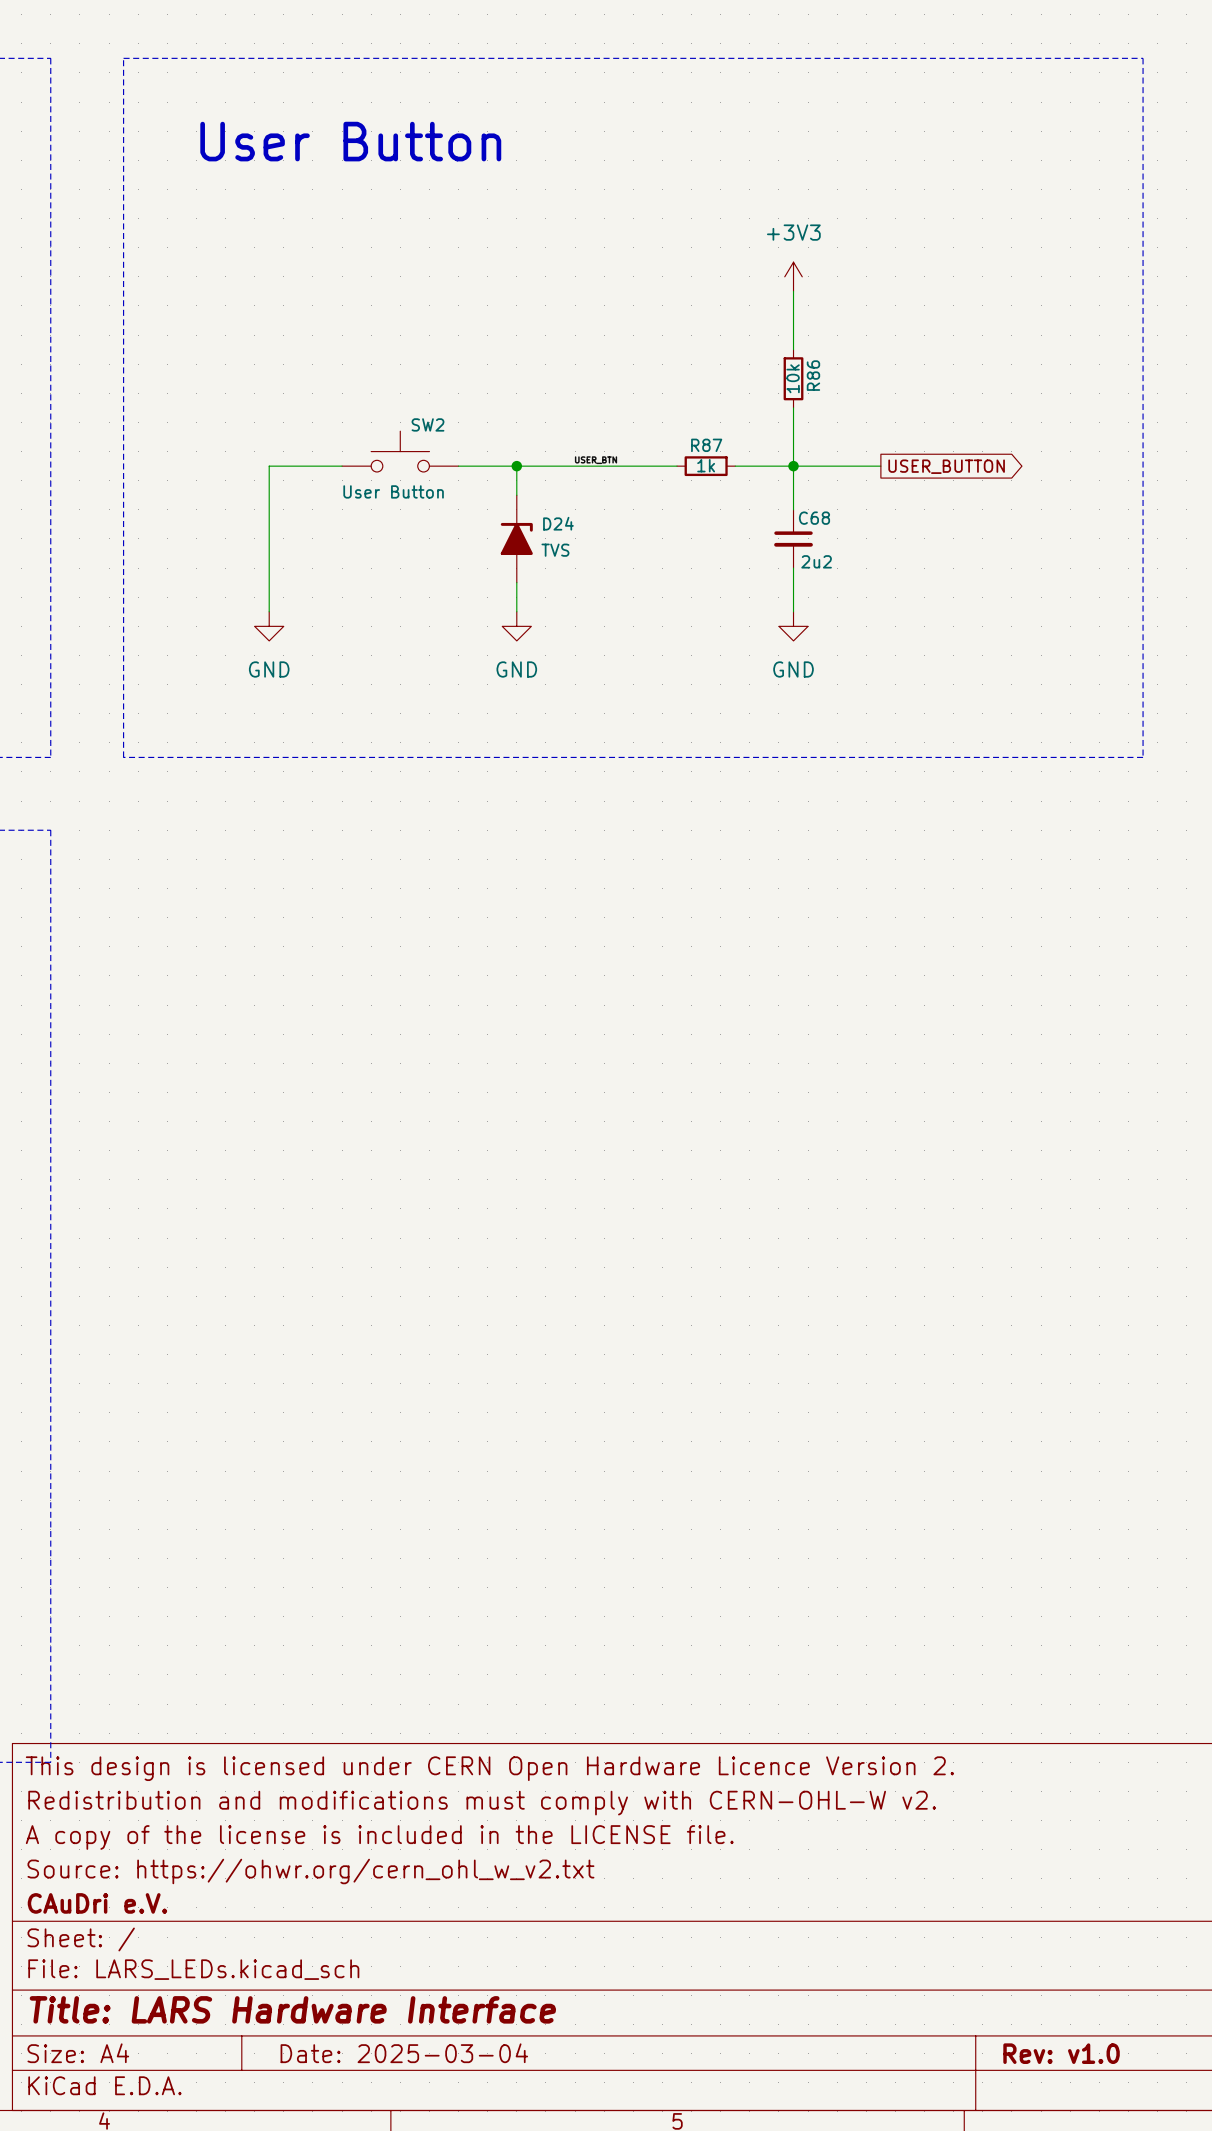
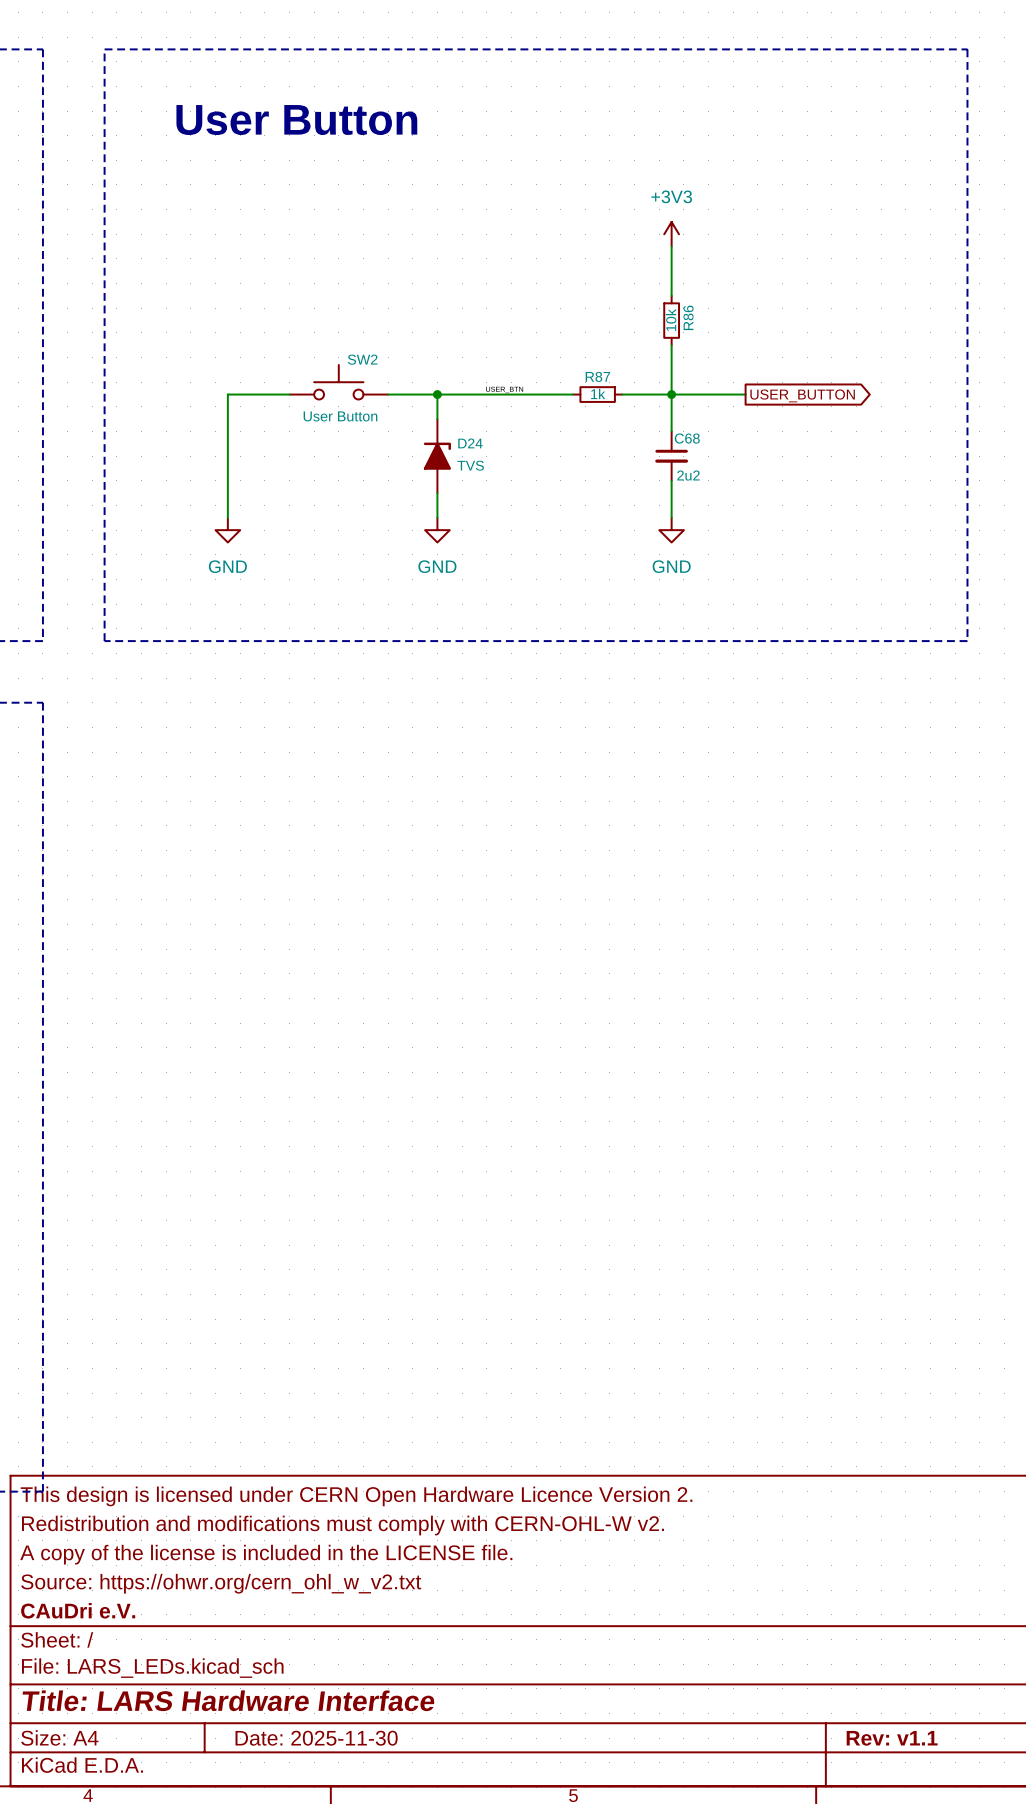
title block: Date: 2025-03-04 (404, 2053) -> Date: 2025-11-30 (316, 1738)
title block: Rev: v1.0 (1061, 2053) -> Rev: v1.1 (892, 1738)

